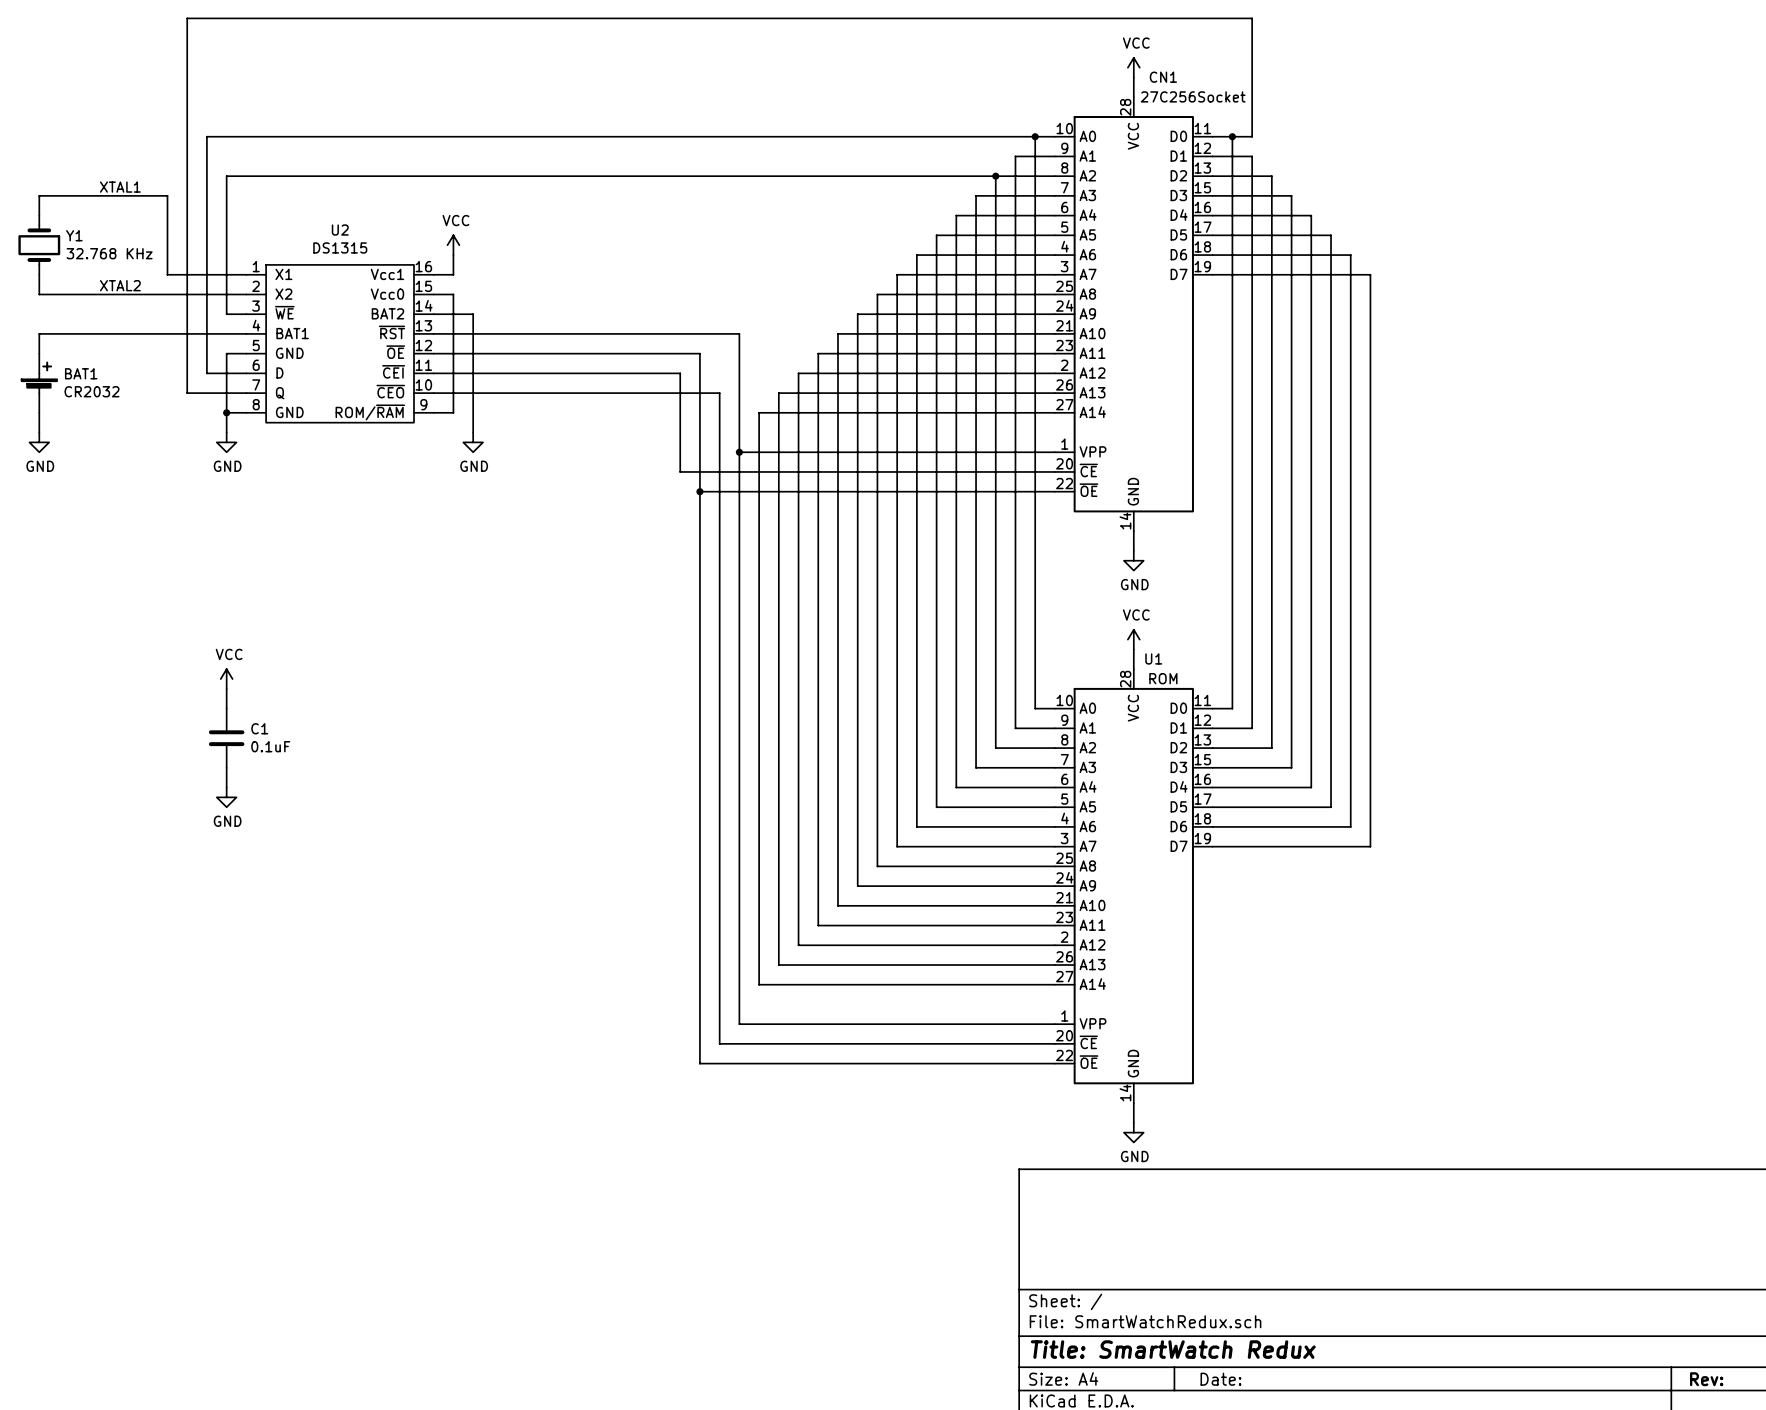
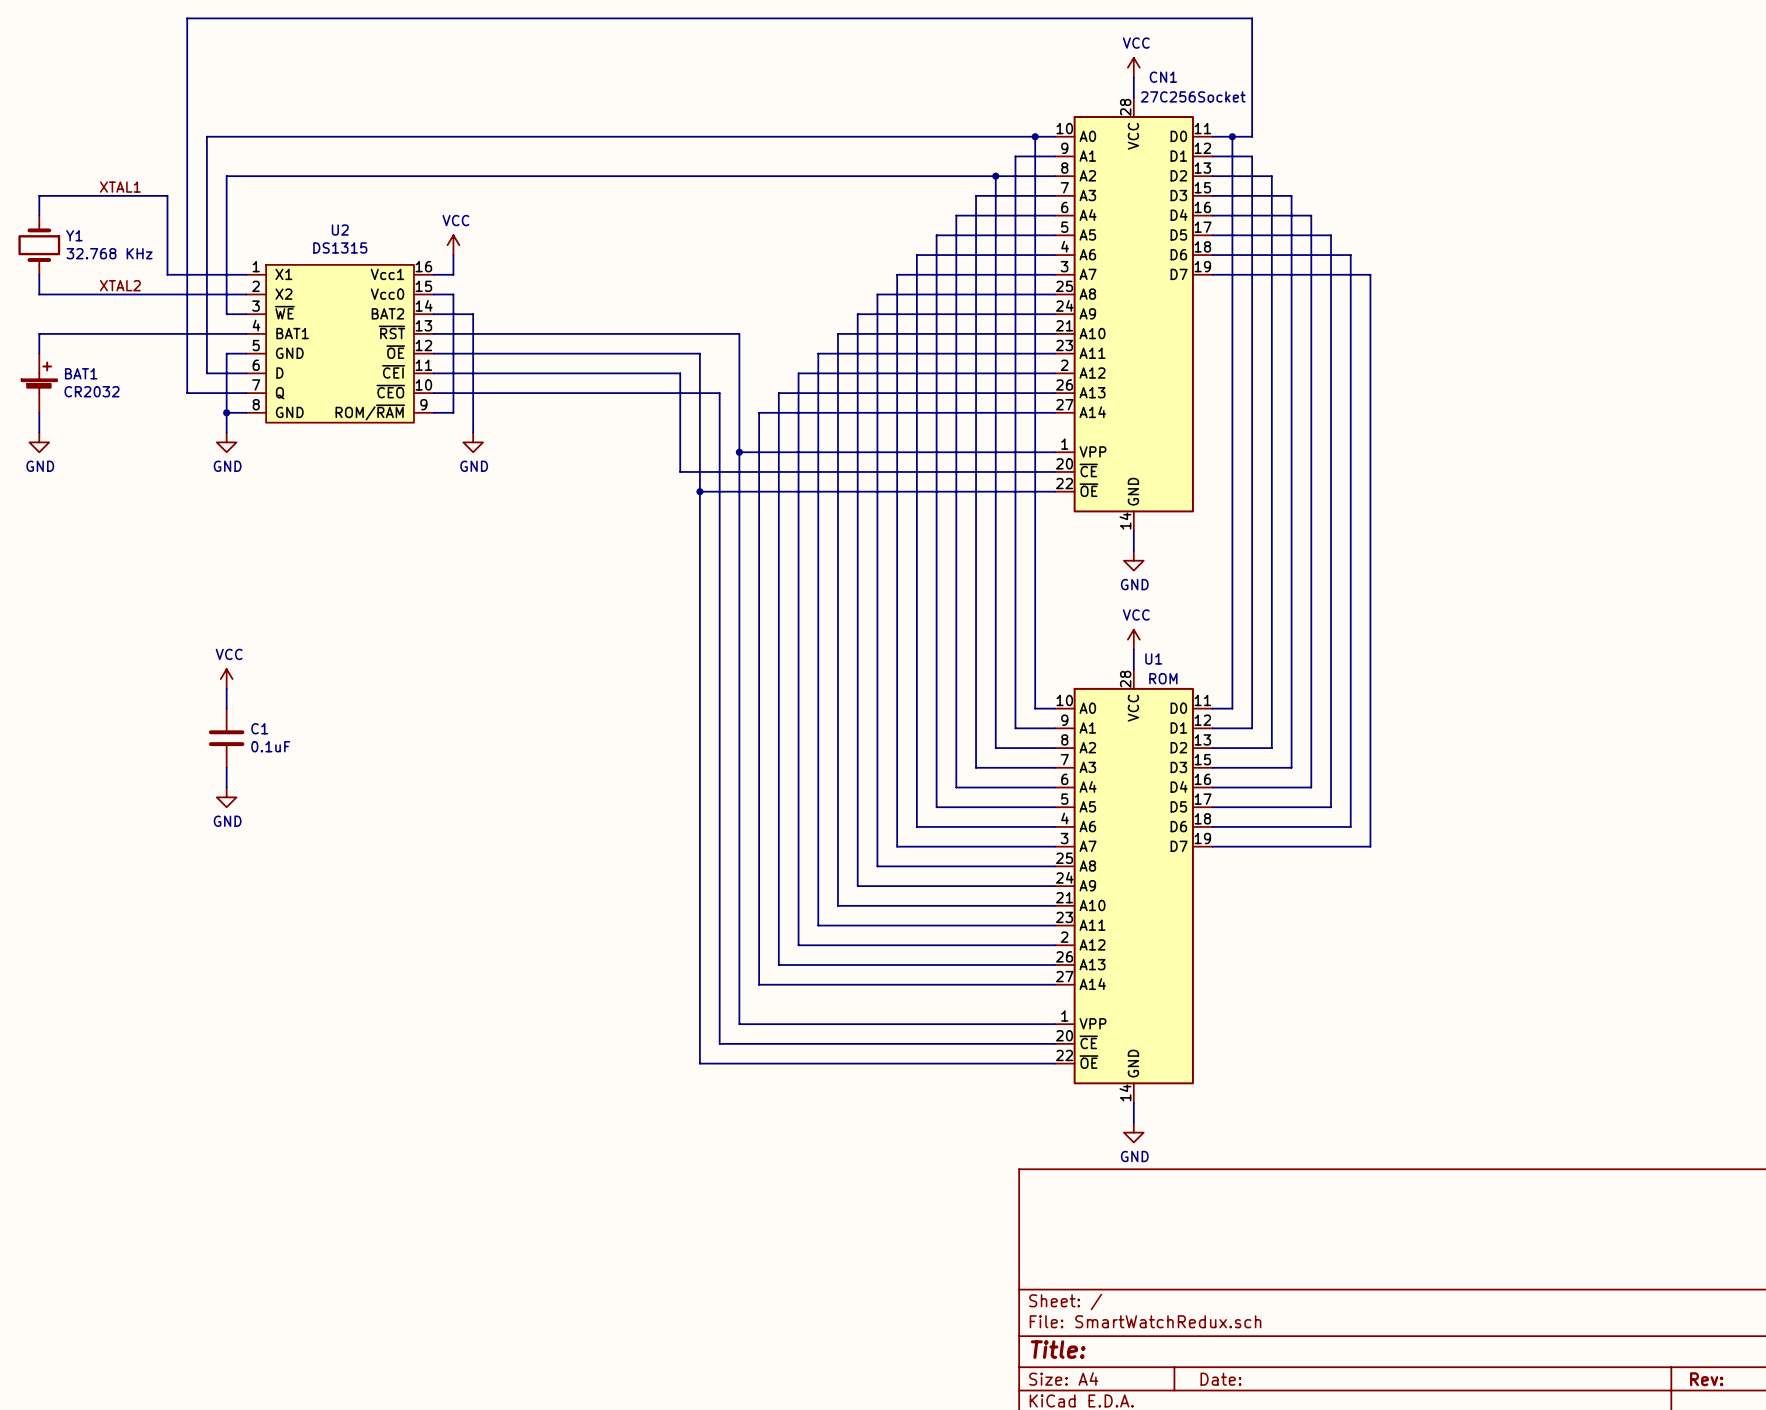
title block: Title: SmartWatch Redux (1173, 1349) -> Title: (1058, 1349)

